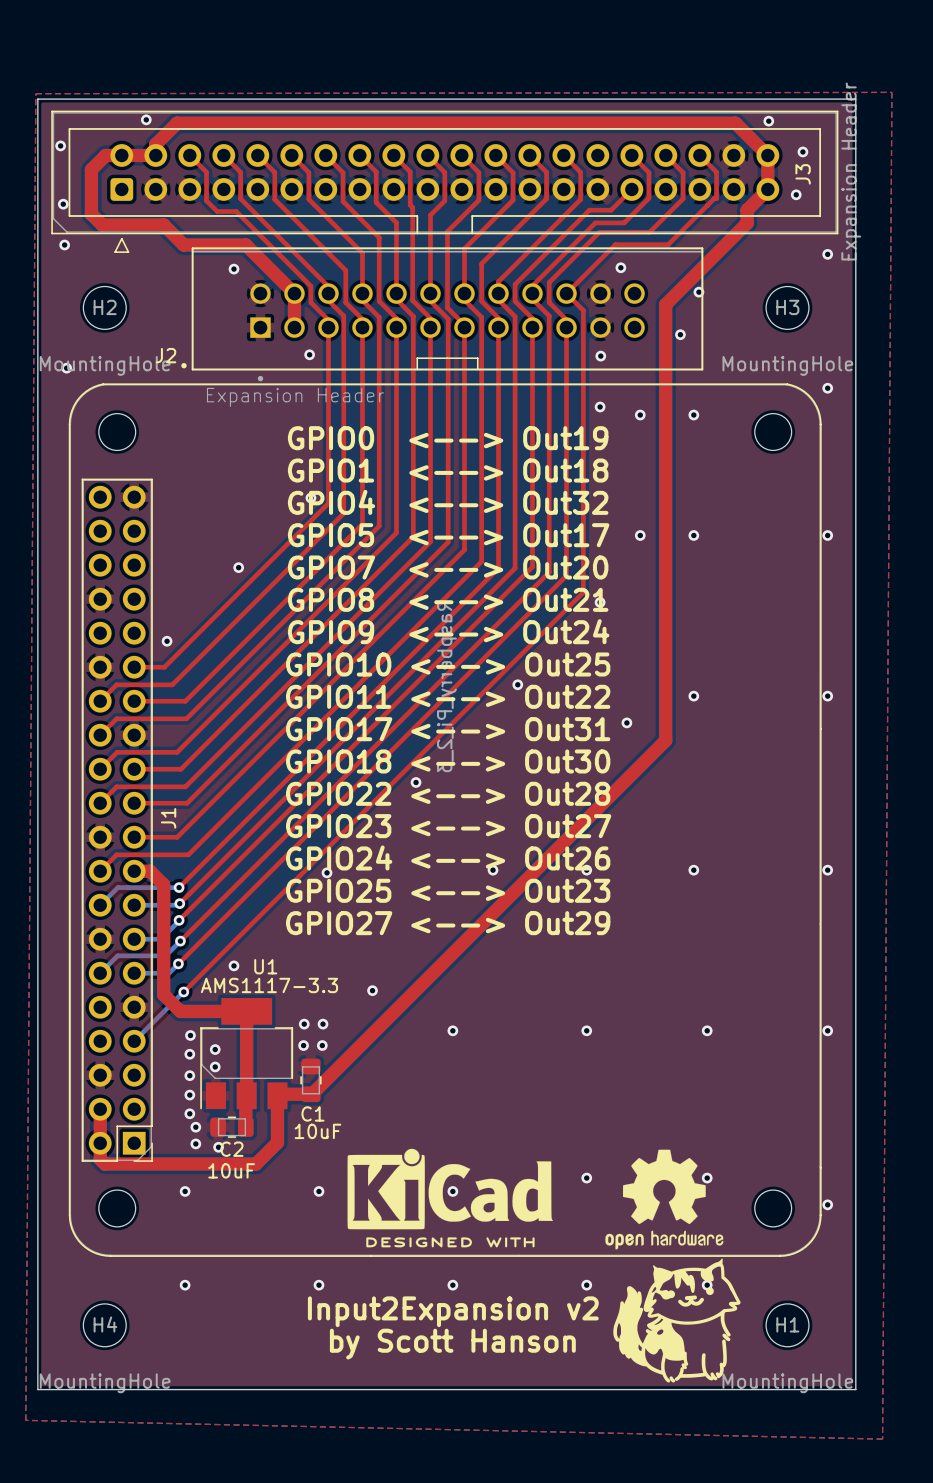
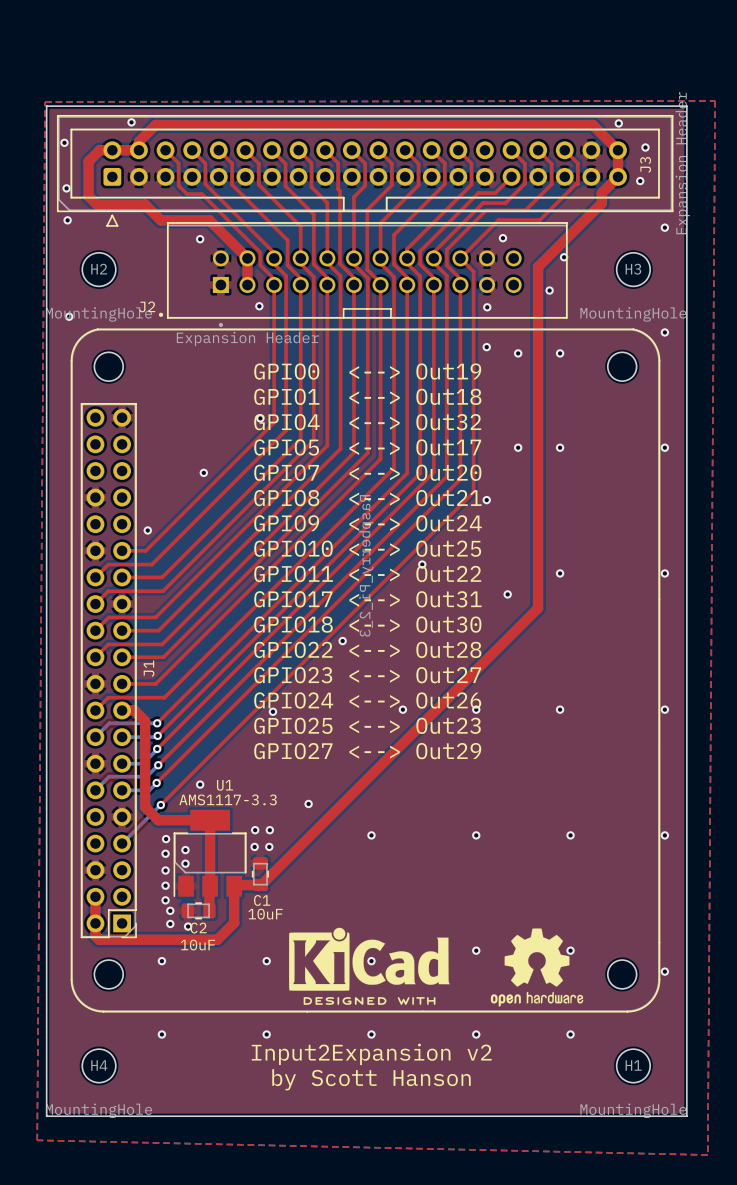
drawing: [613, 1258, 741, 1383] -> none

